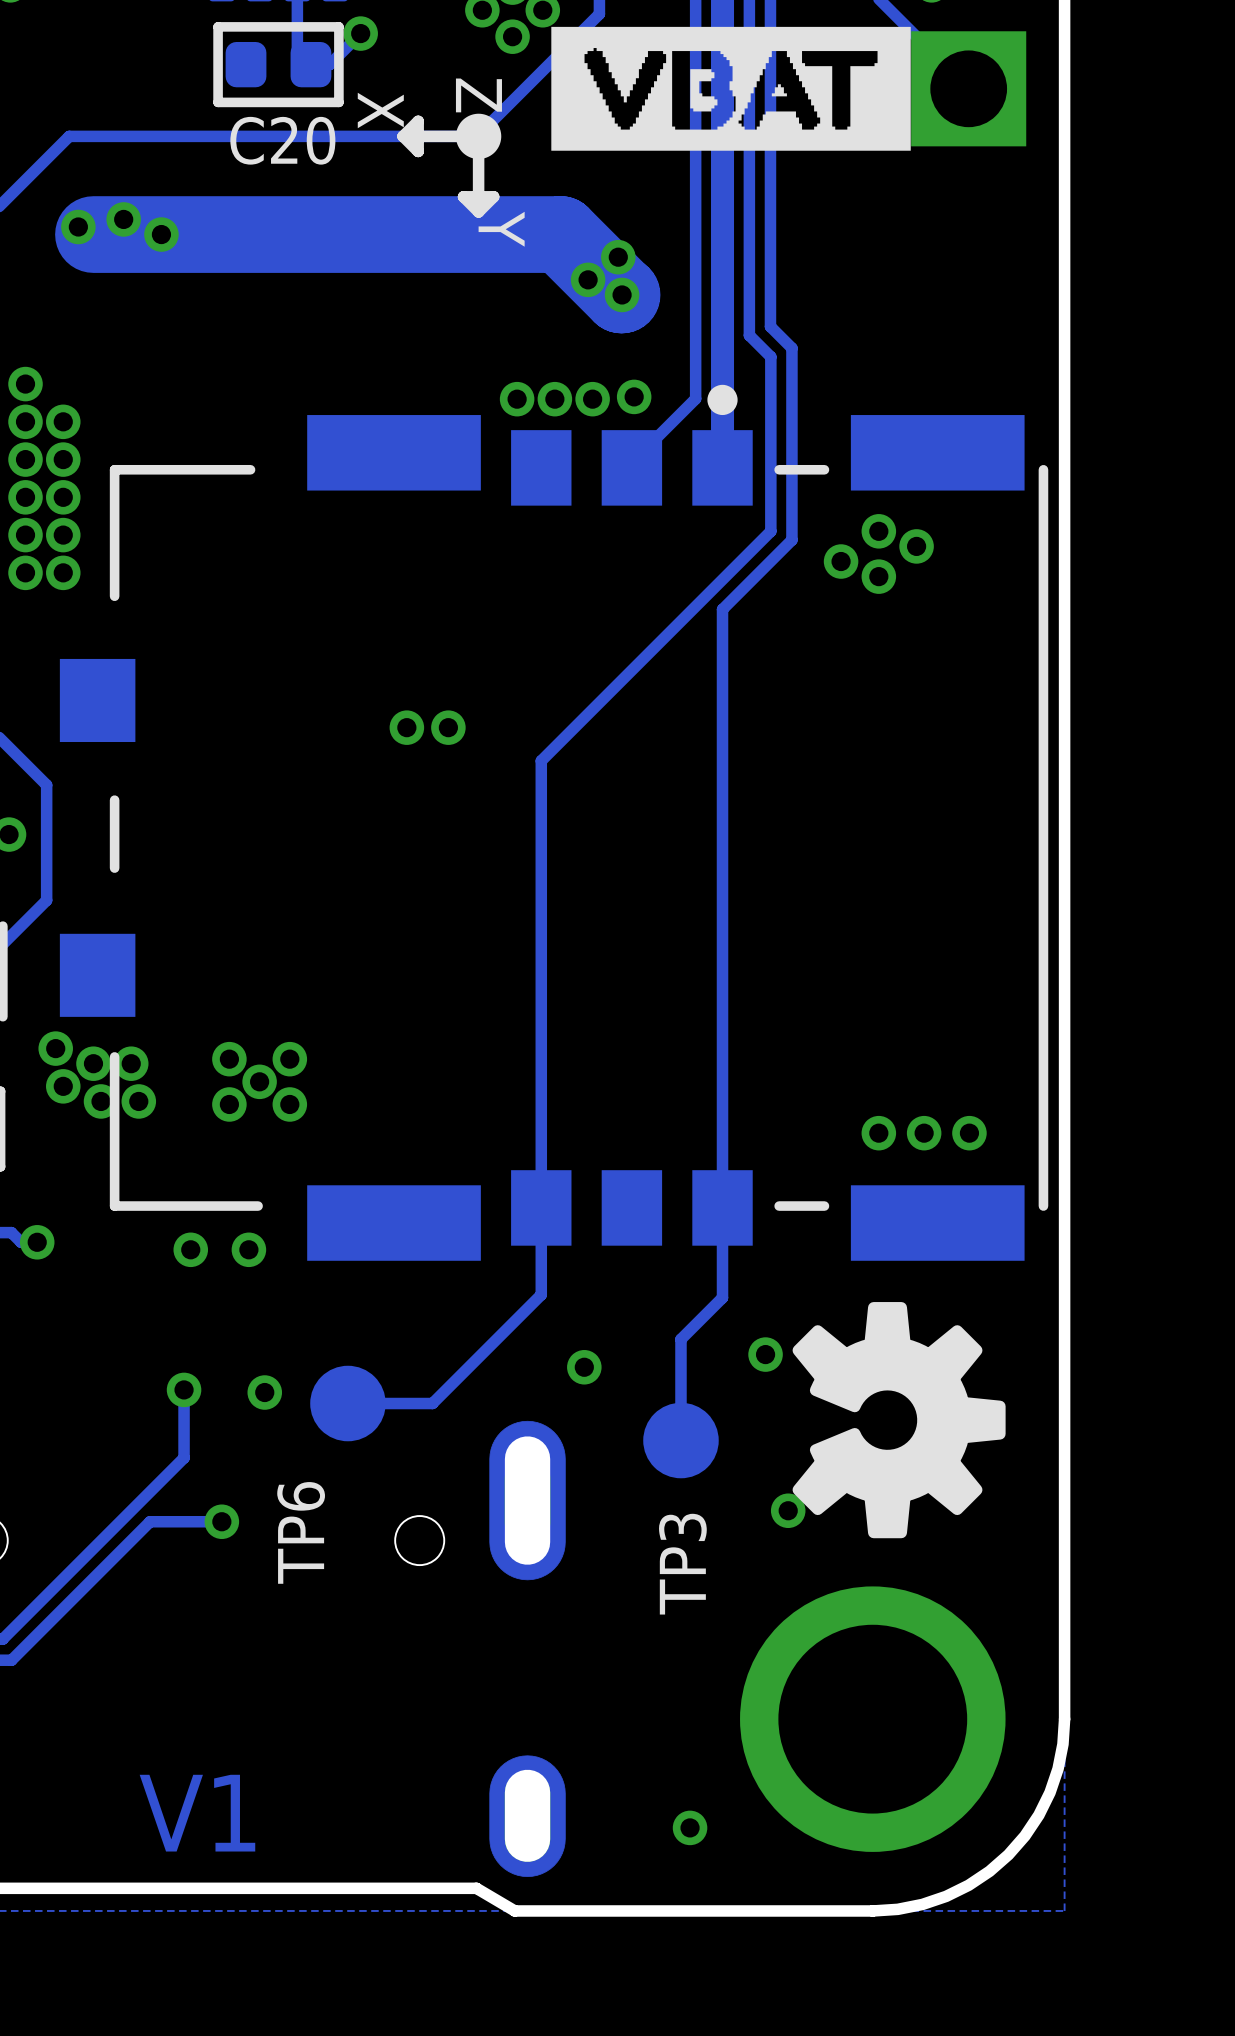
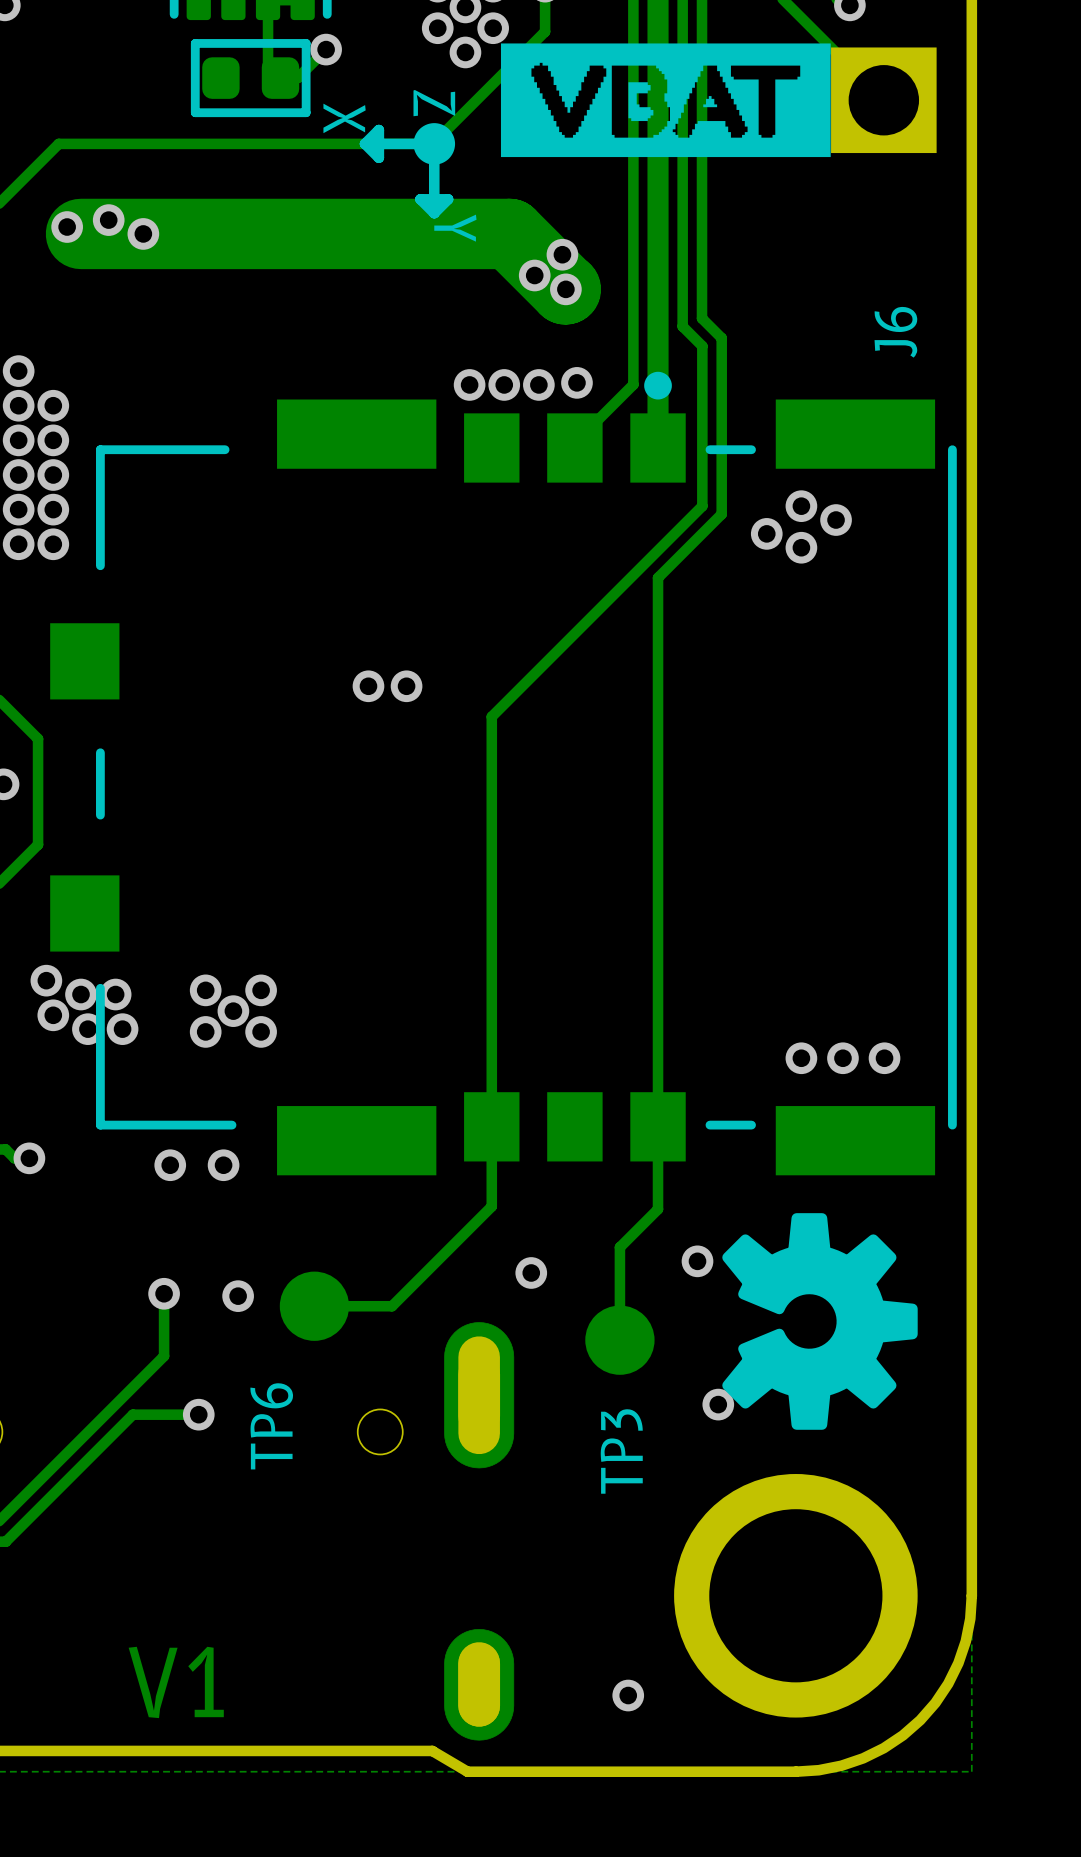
C20 name: C20 (282, 140) -> none
J6 name: none -> J6 (895, 332)

